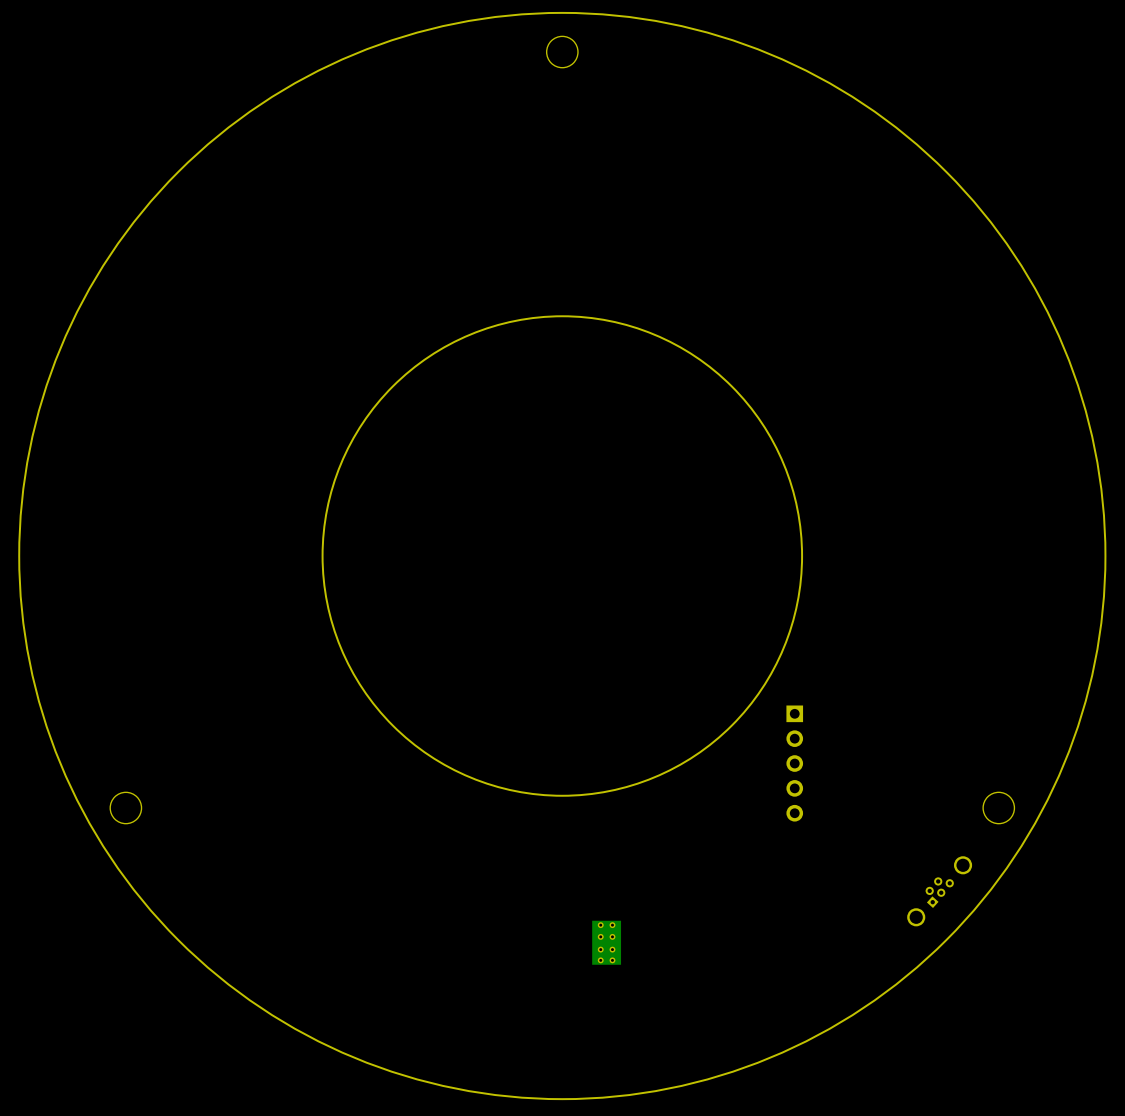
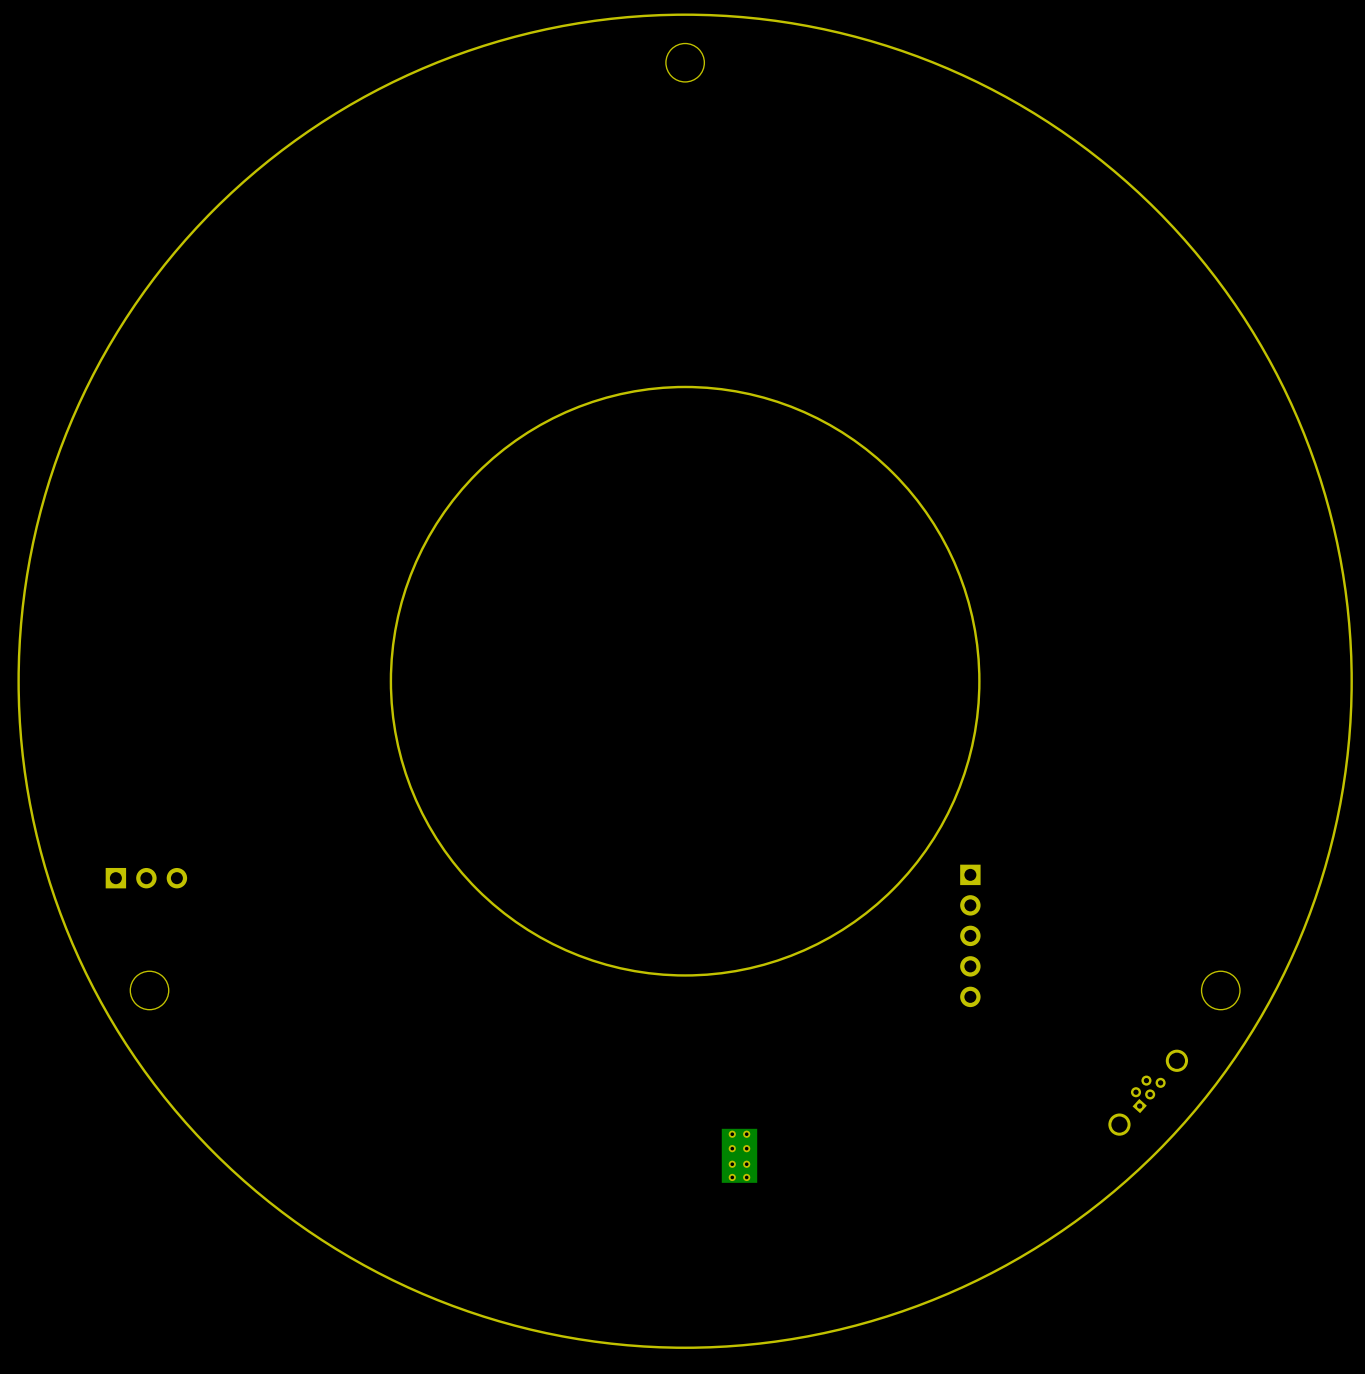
part: none -> (146, 878)

